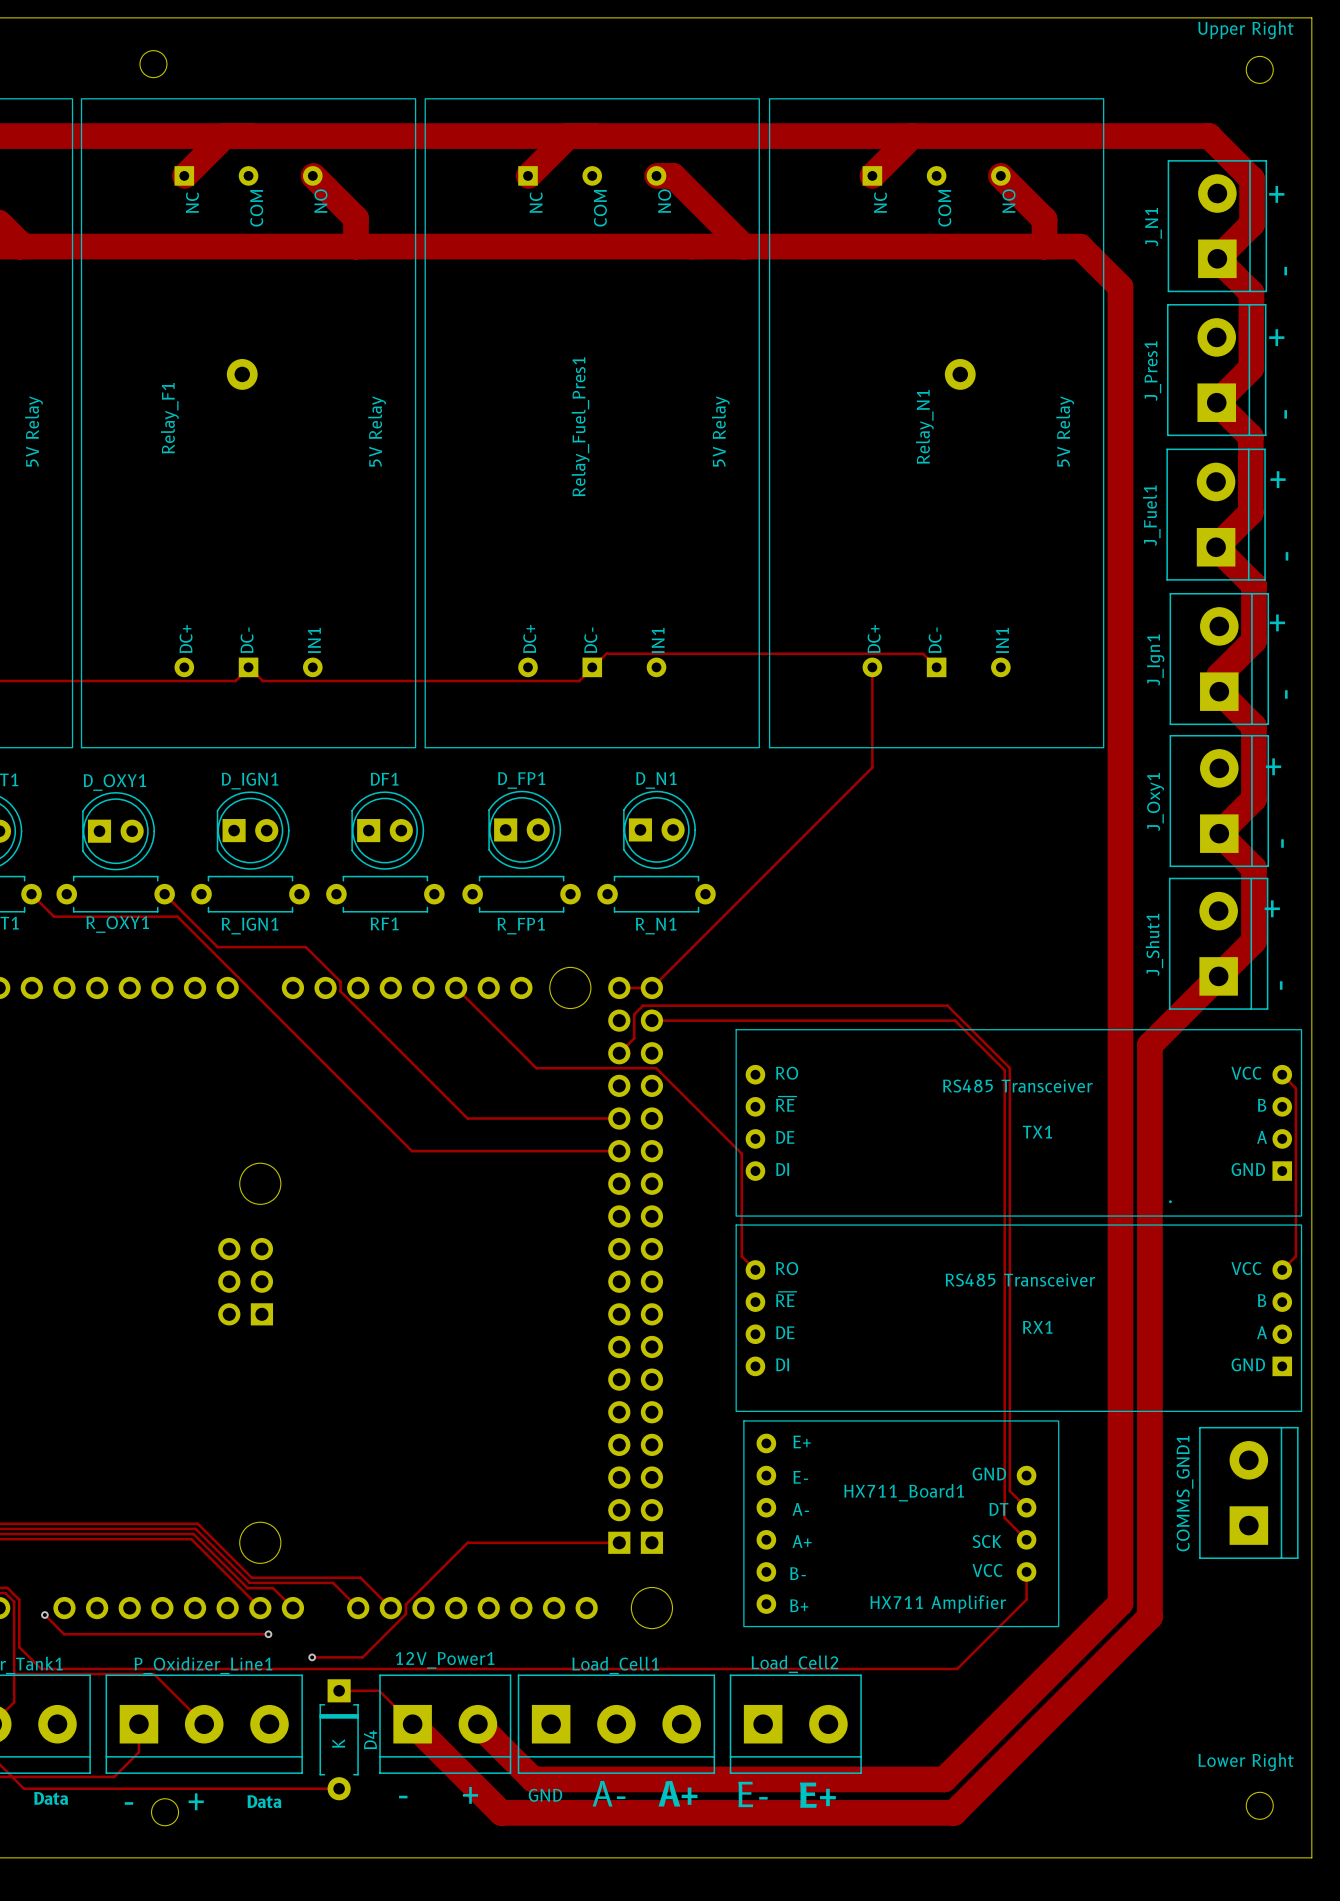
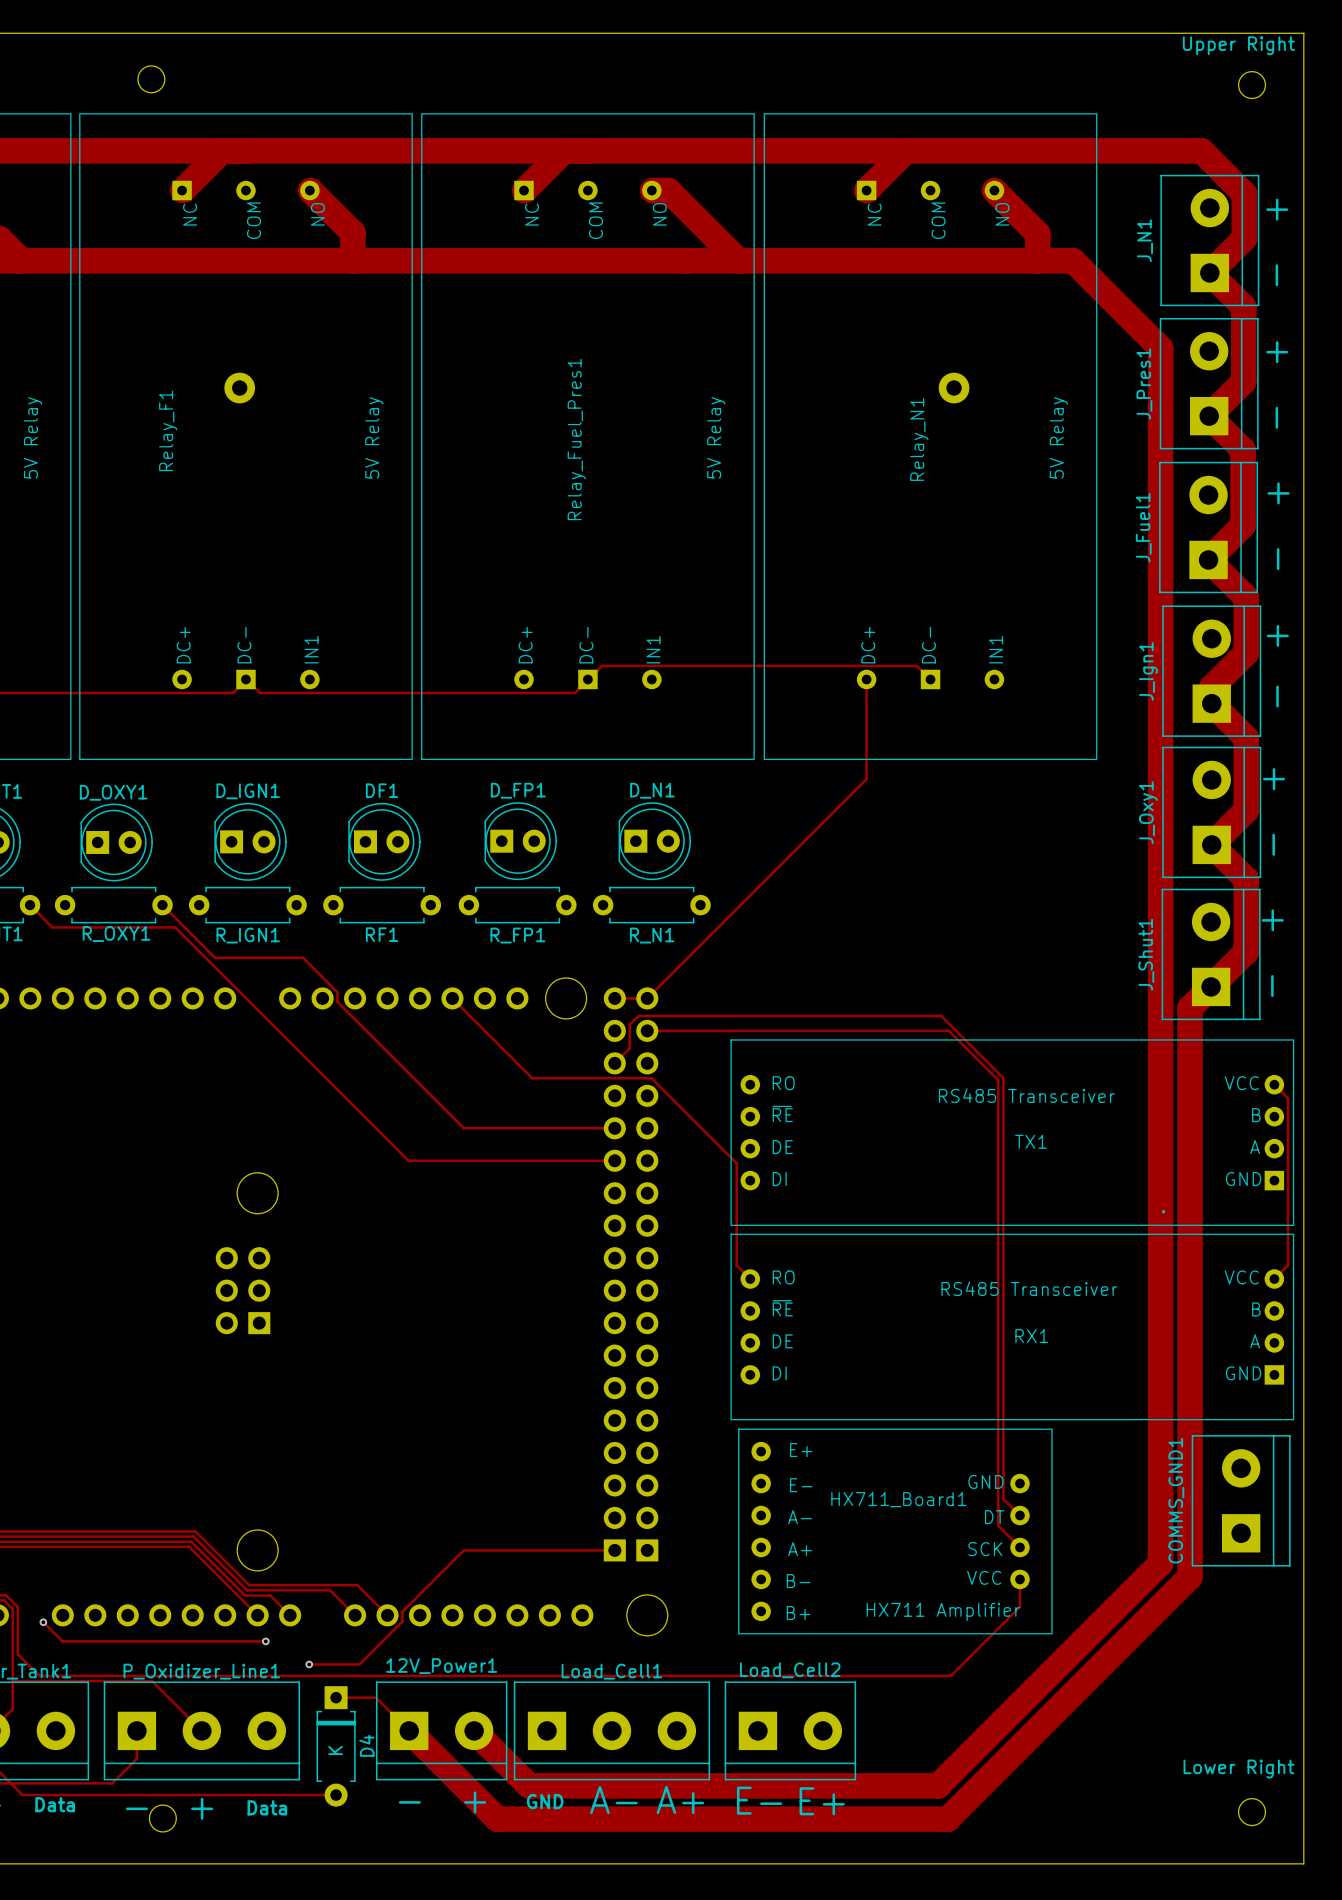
track: (1120, 287) (1120, 1603) -> (1113, 301) (1160, 348) (1160, 1563) (1113, 1610)
track: (1197, 997) (1149, 1045) (1149, 1616) -> (1190, 1008) (1190, 1576) (1142, 1624)

